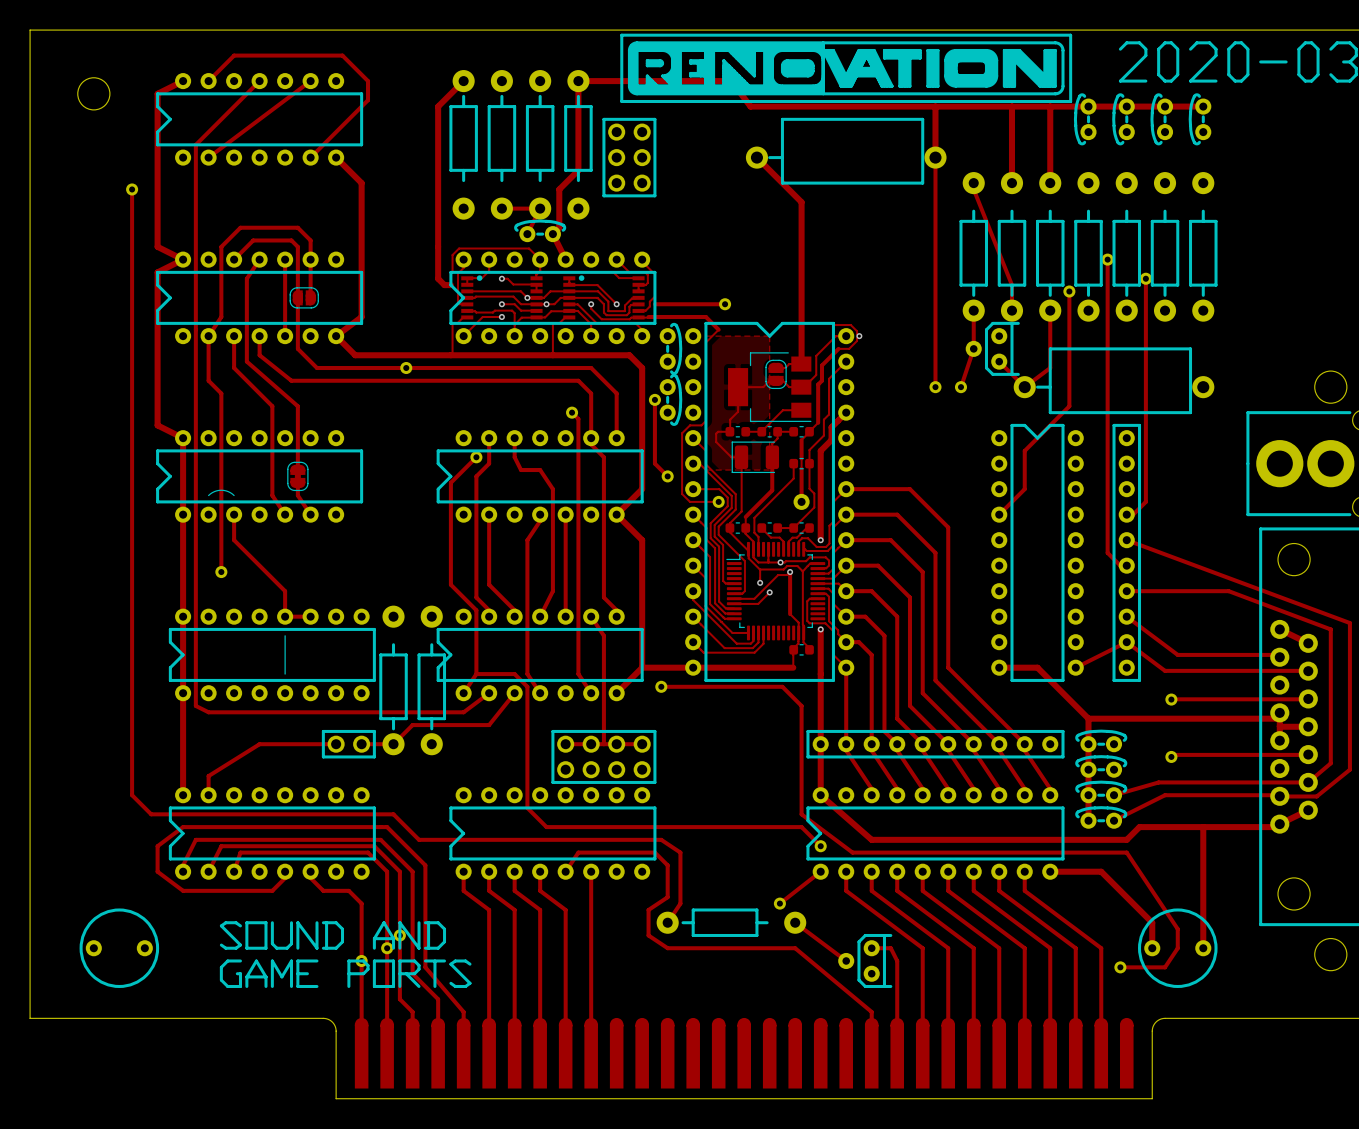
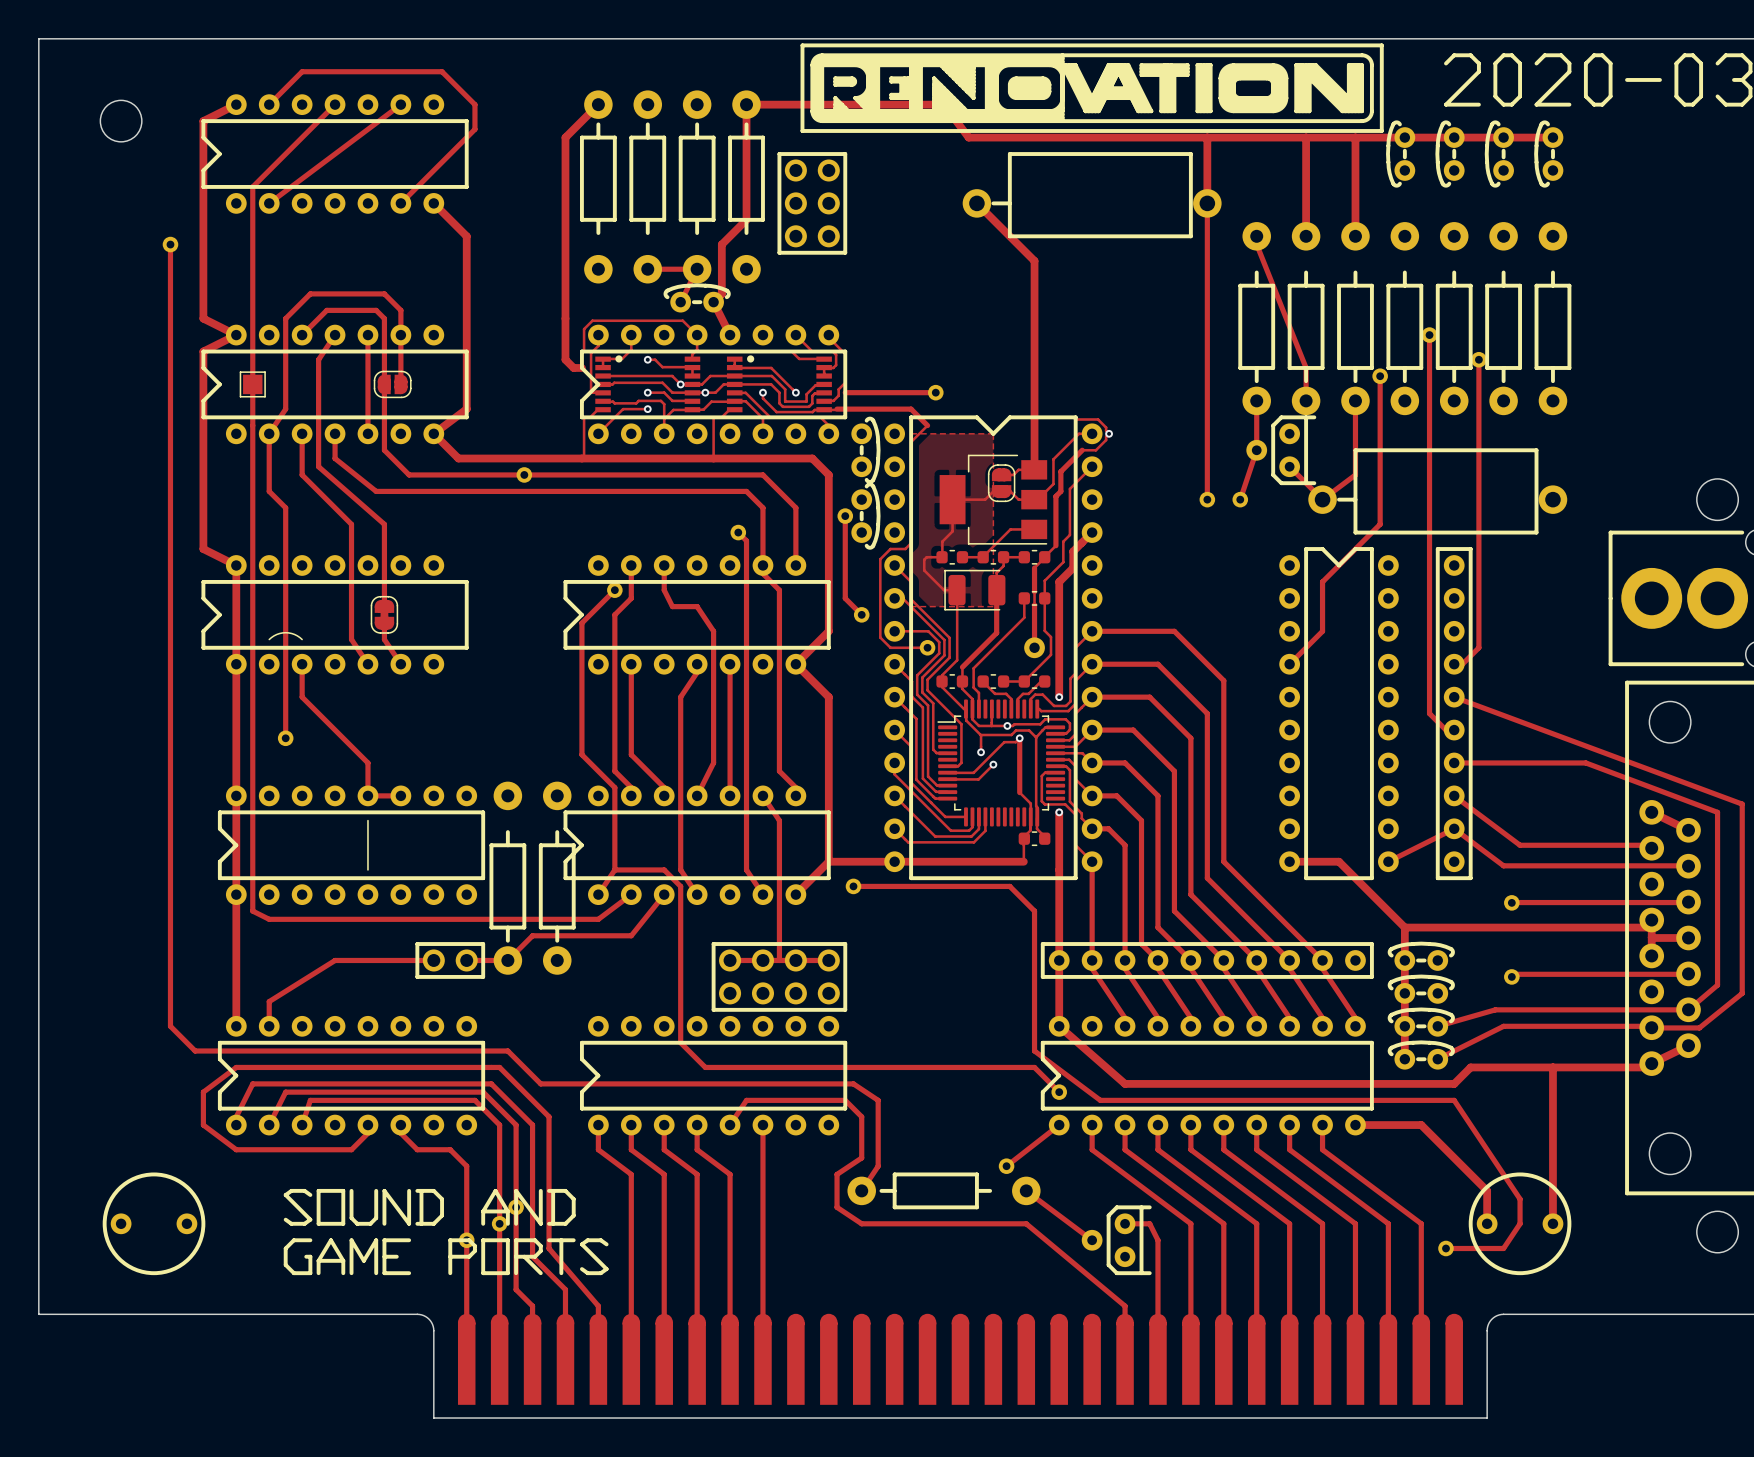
part: none -> (252, 384)

